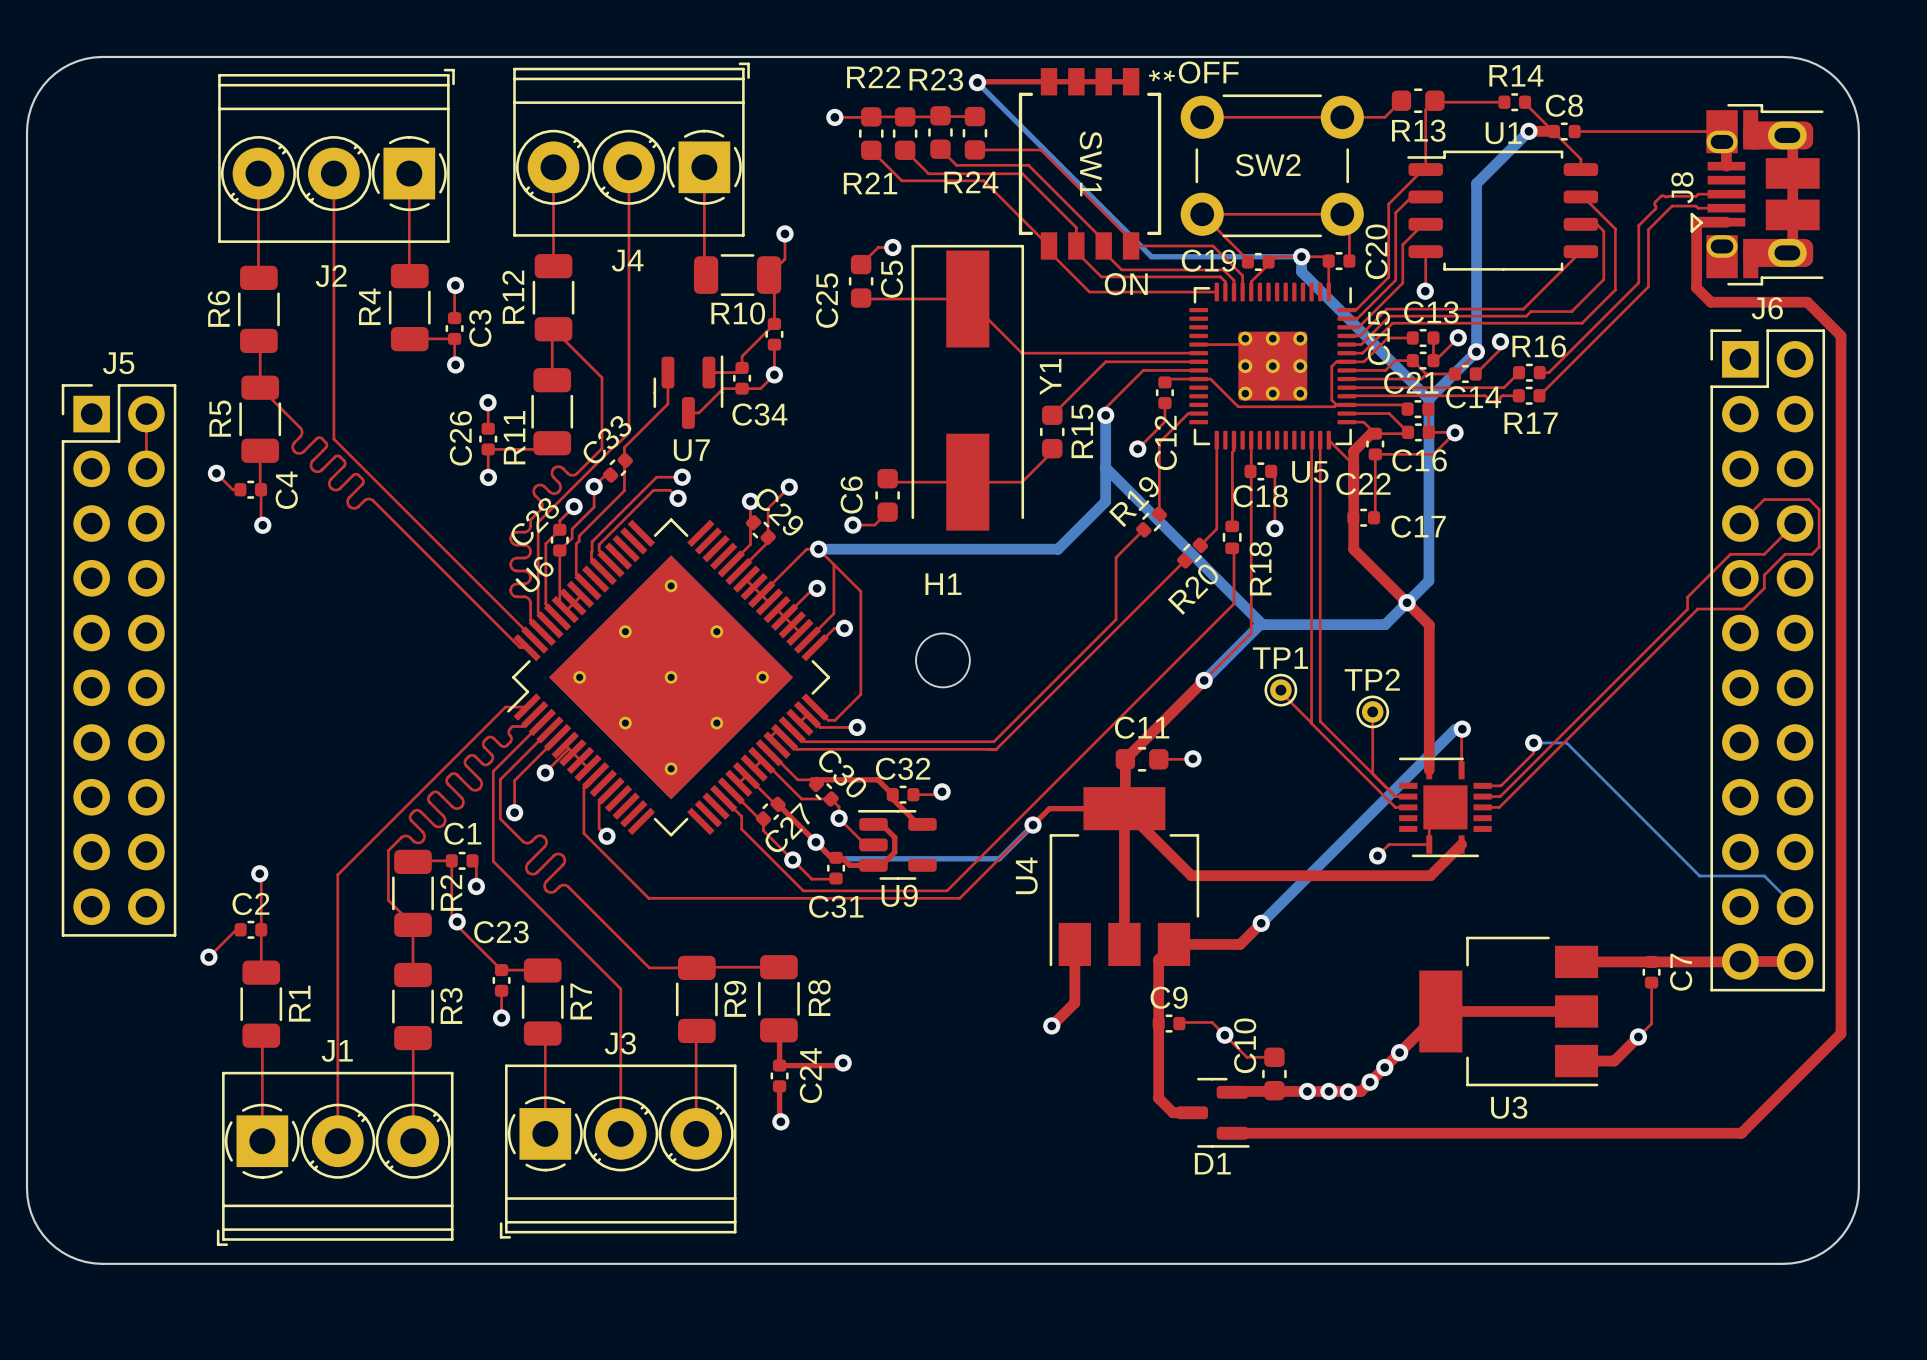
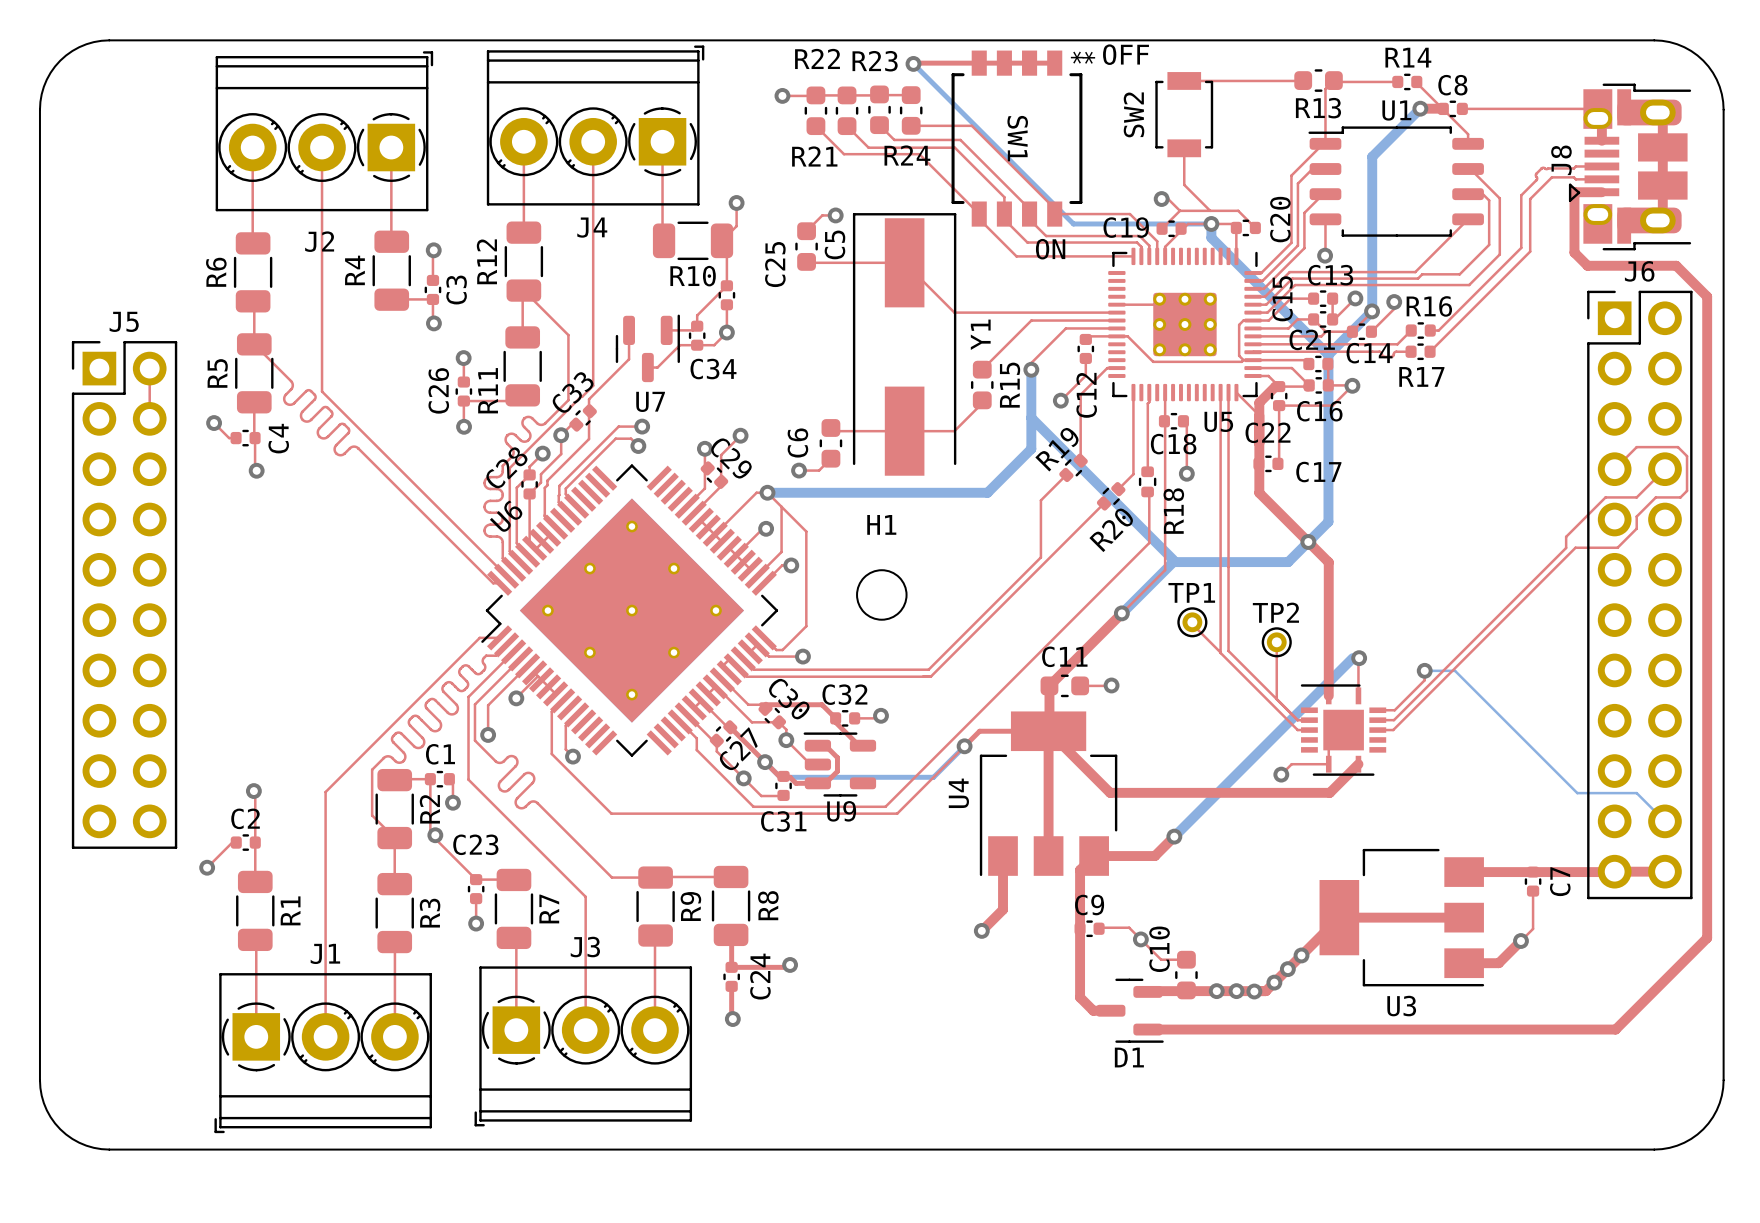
SW2 footprint: [1180, 94, 1364, 238] -> [1155, 72, 1214, 158]
top track: (1401, 101) (1384, 117) (1202, 117) -> (1302, 80) (1184, 80)
SW2 name position: SW2 (1268, 165) -> SW2 (1134, 114)
top track: none -> (1184, 148) (1184, 184) (1210, 210)
top track: (1342, 214) (1202, 214) (1247, 261) -> (1179, 210) (1162, 228)
top track: none -> (1161, 199) (1168, 199) (1179, 210)
via: none -> (1161, 199)
top track: (1349, 230) (1349, 261) -> (1179, 210) (1238, 210) (1255, 227)

